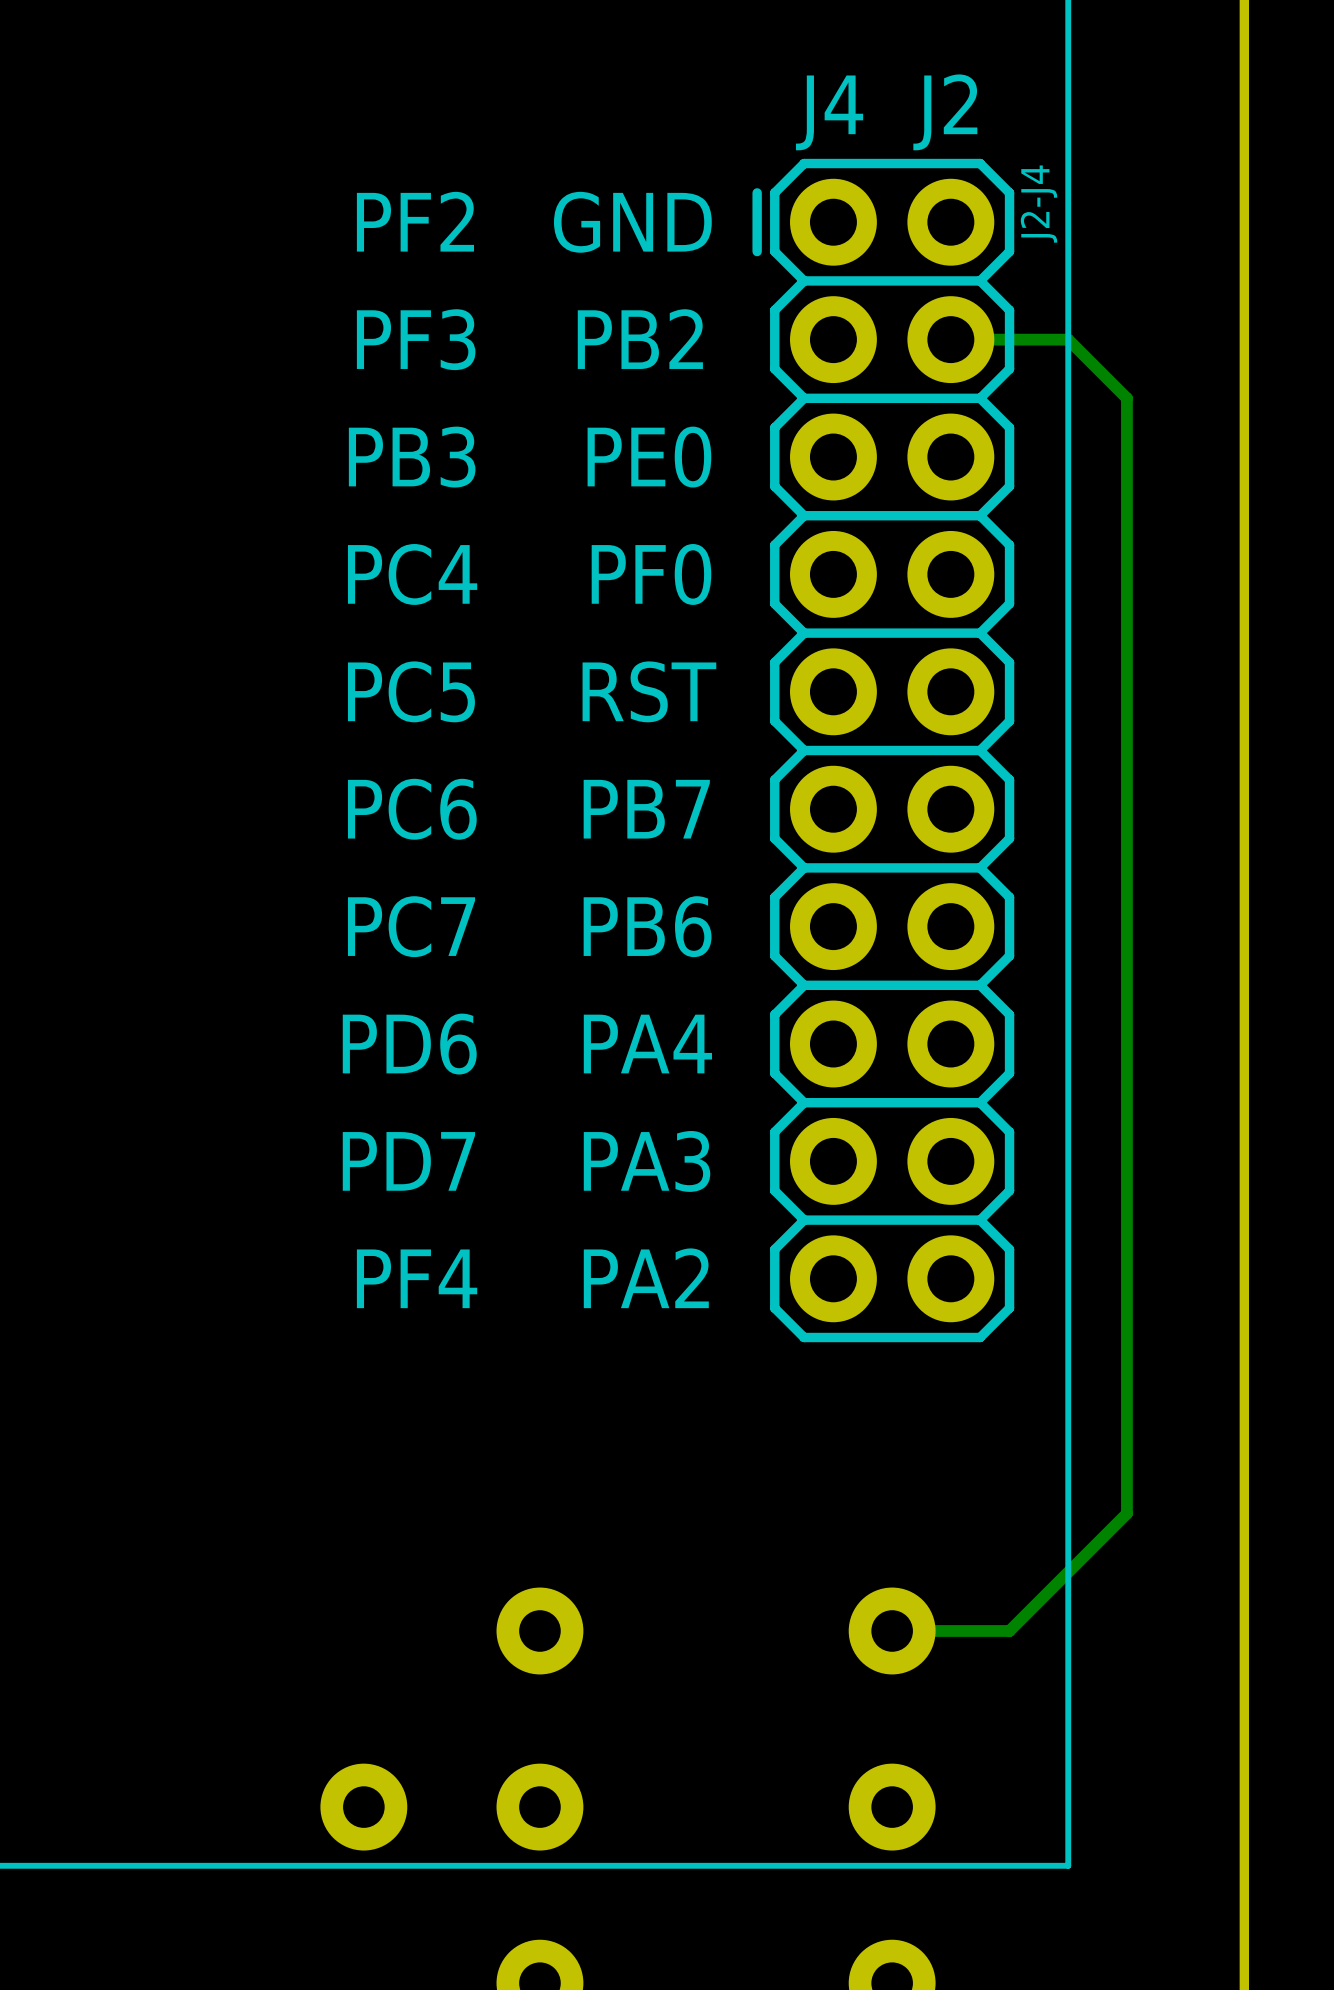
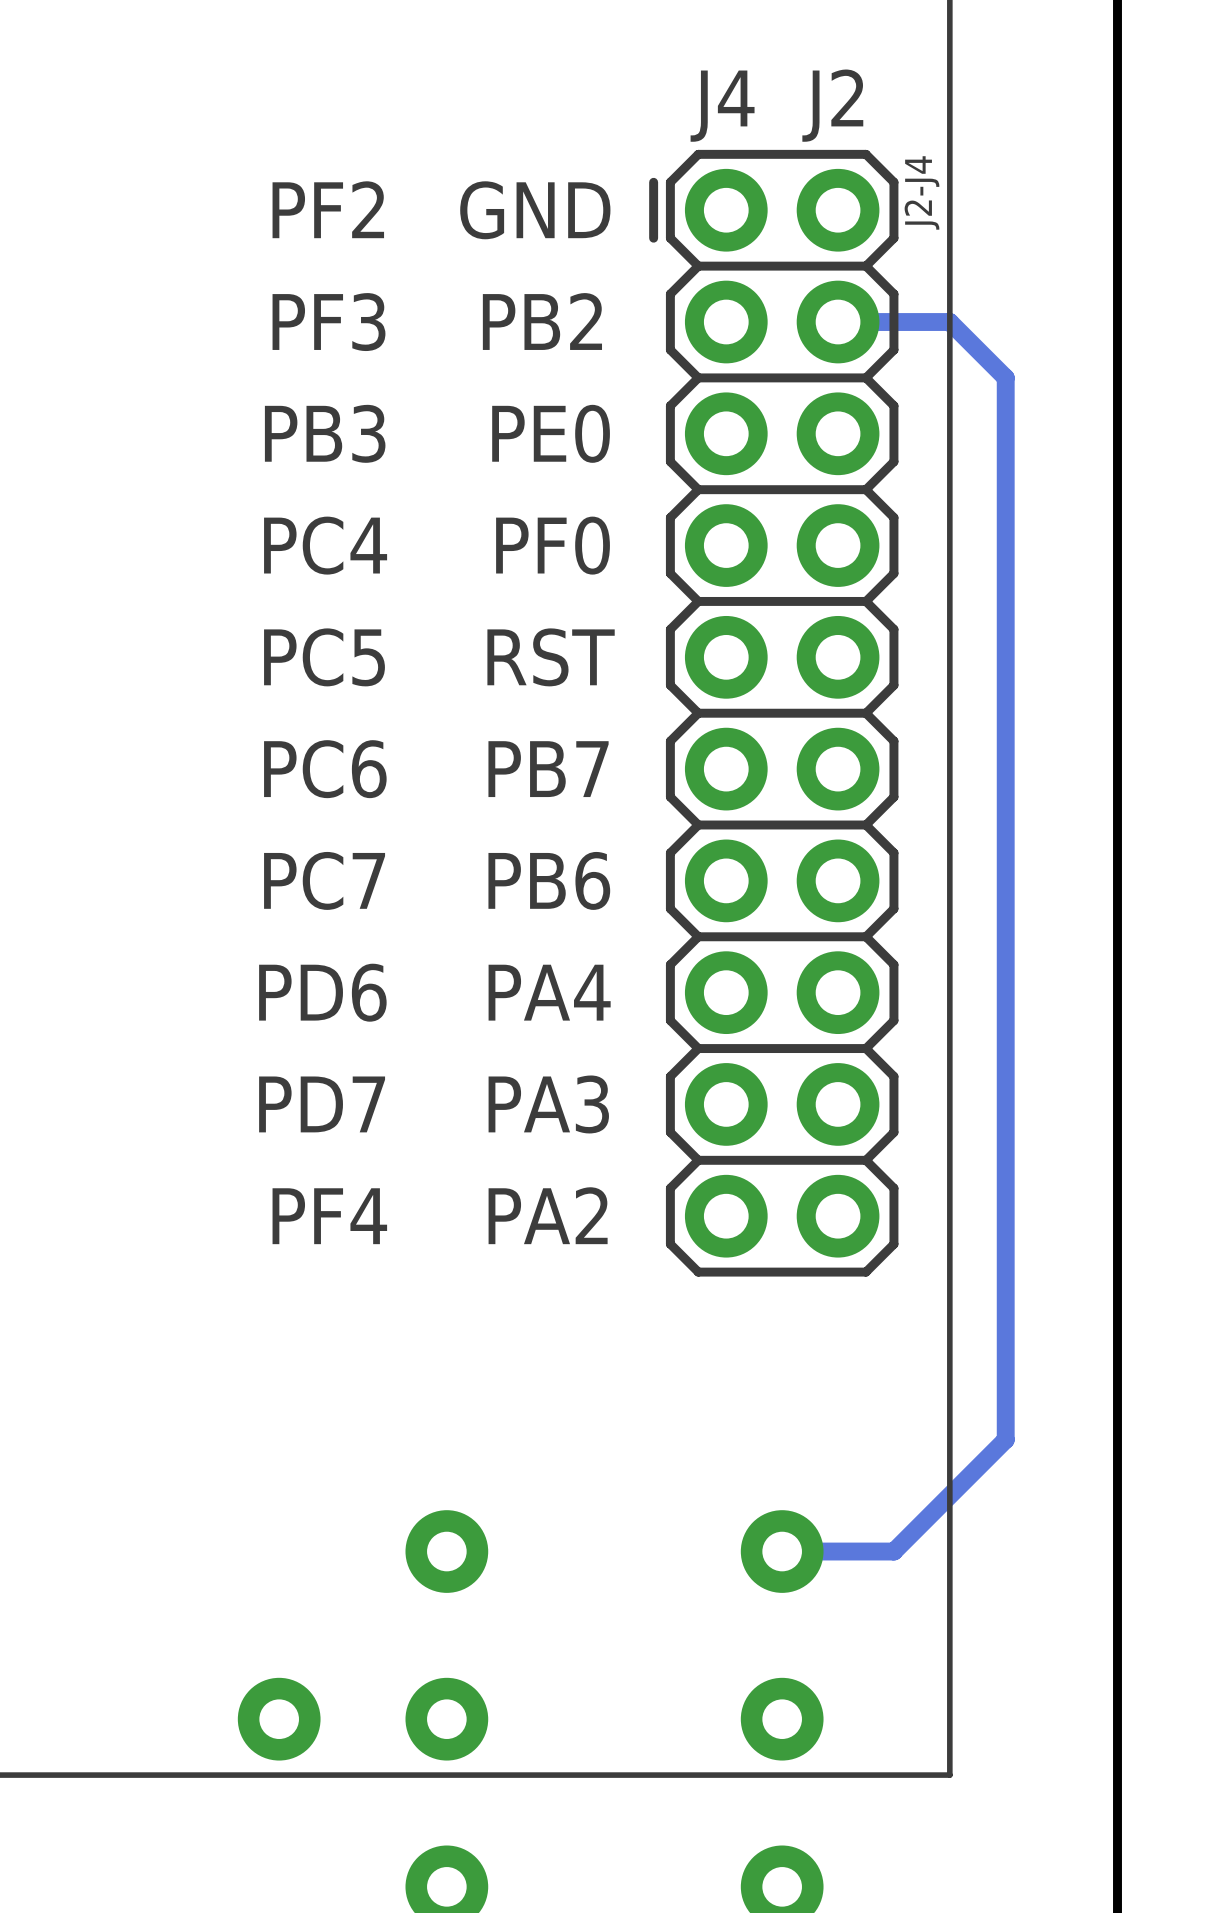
track width: thin (950, 339) (1068, 339) (1126, 398) (1126, 1513) (1009, 1630) (892, 1630) -> thick (838, 322) (949, 322) (1005, 377) (1005, 1439) (893, 1551) (782, 1551)

